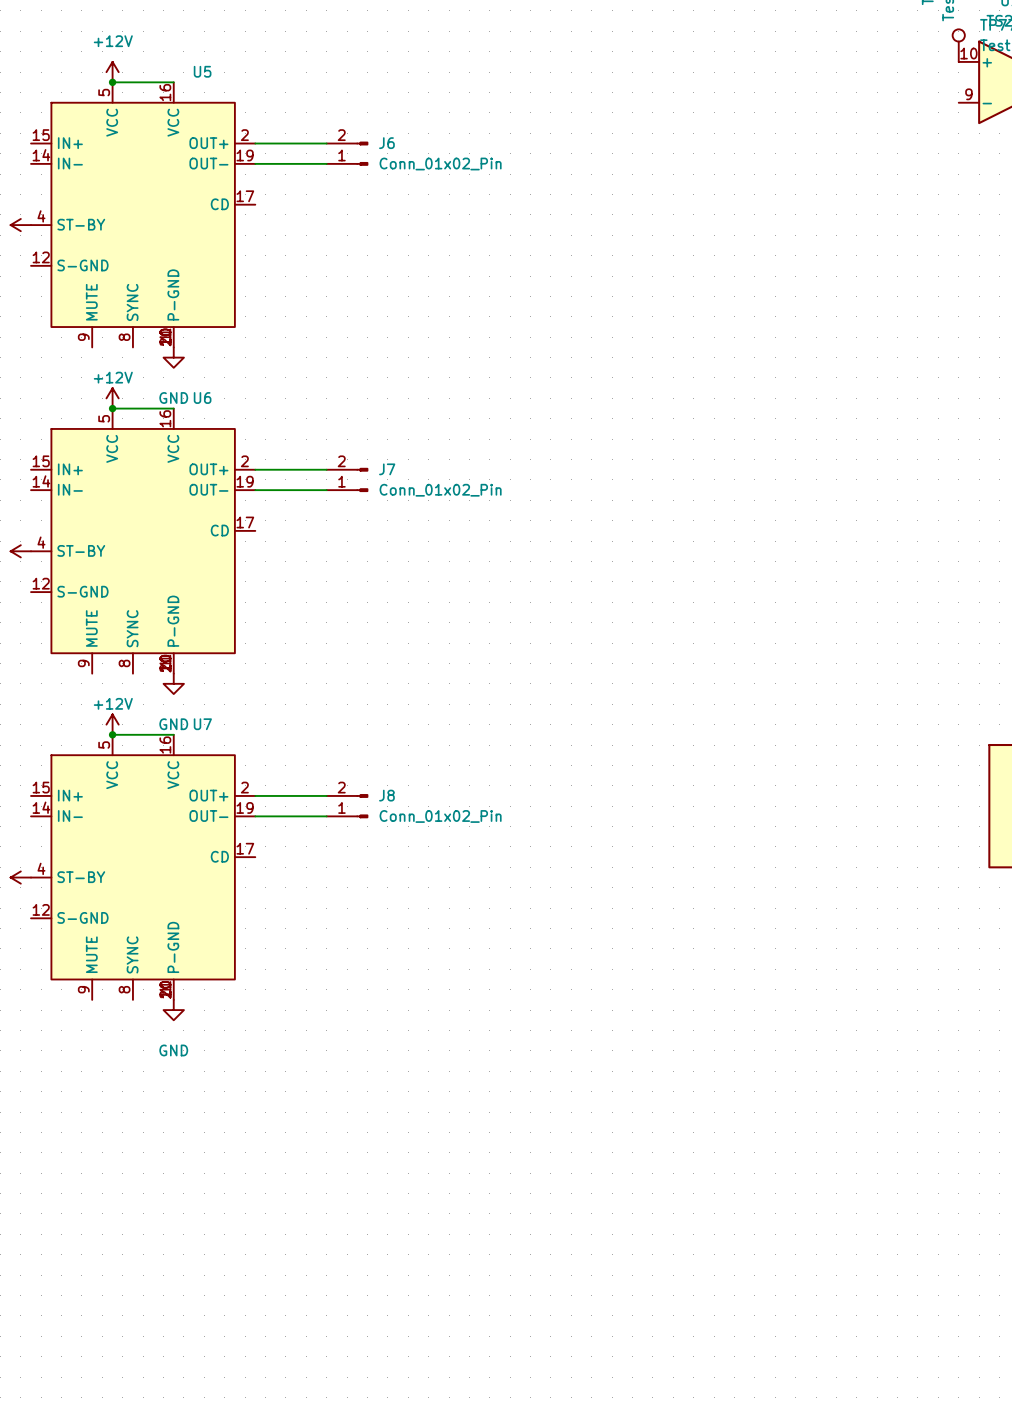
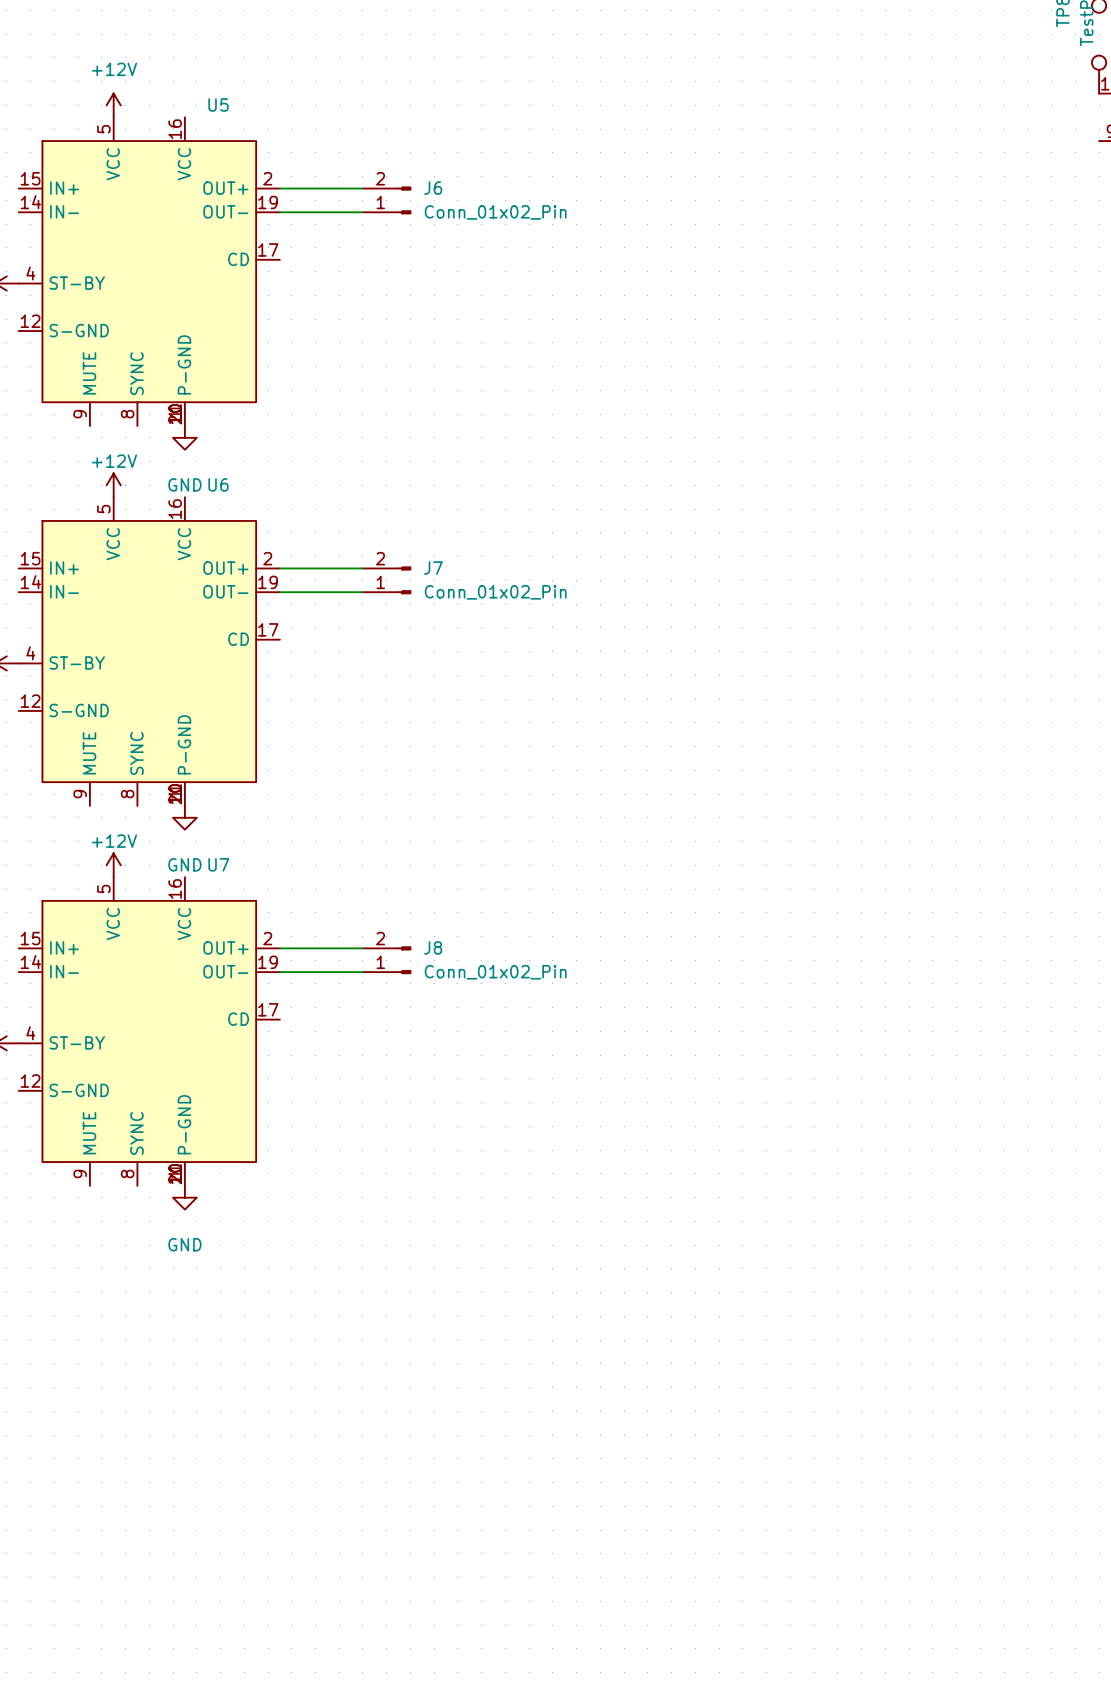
wire: (112, 82) (173, 82) -> none
junction: (112, 82) -> none
wire: (112, 408) (173, 408) -> none
junction: (112, 408) -> none
wire: (112, 734) (173, 734) -> none
junction: (112, 734) -> none

